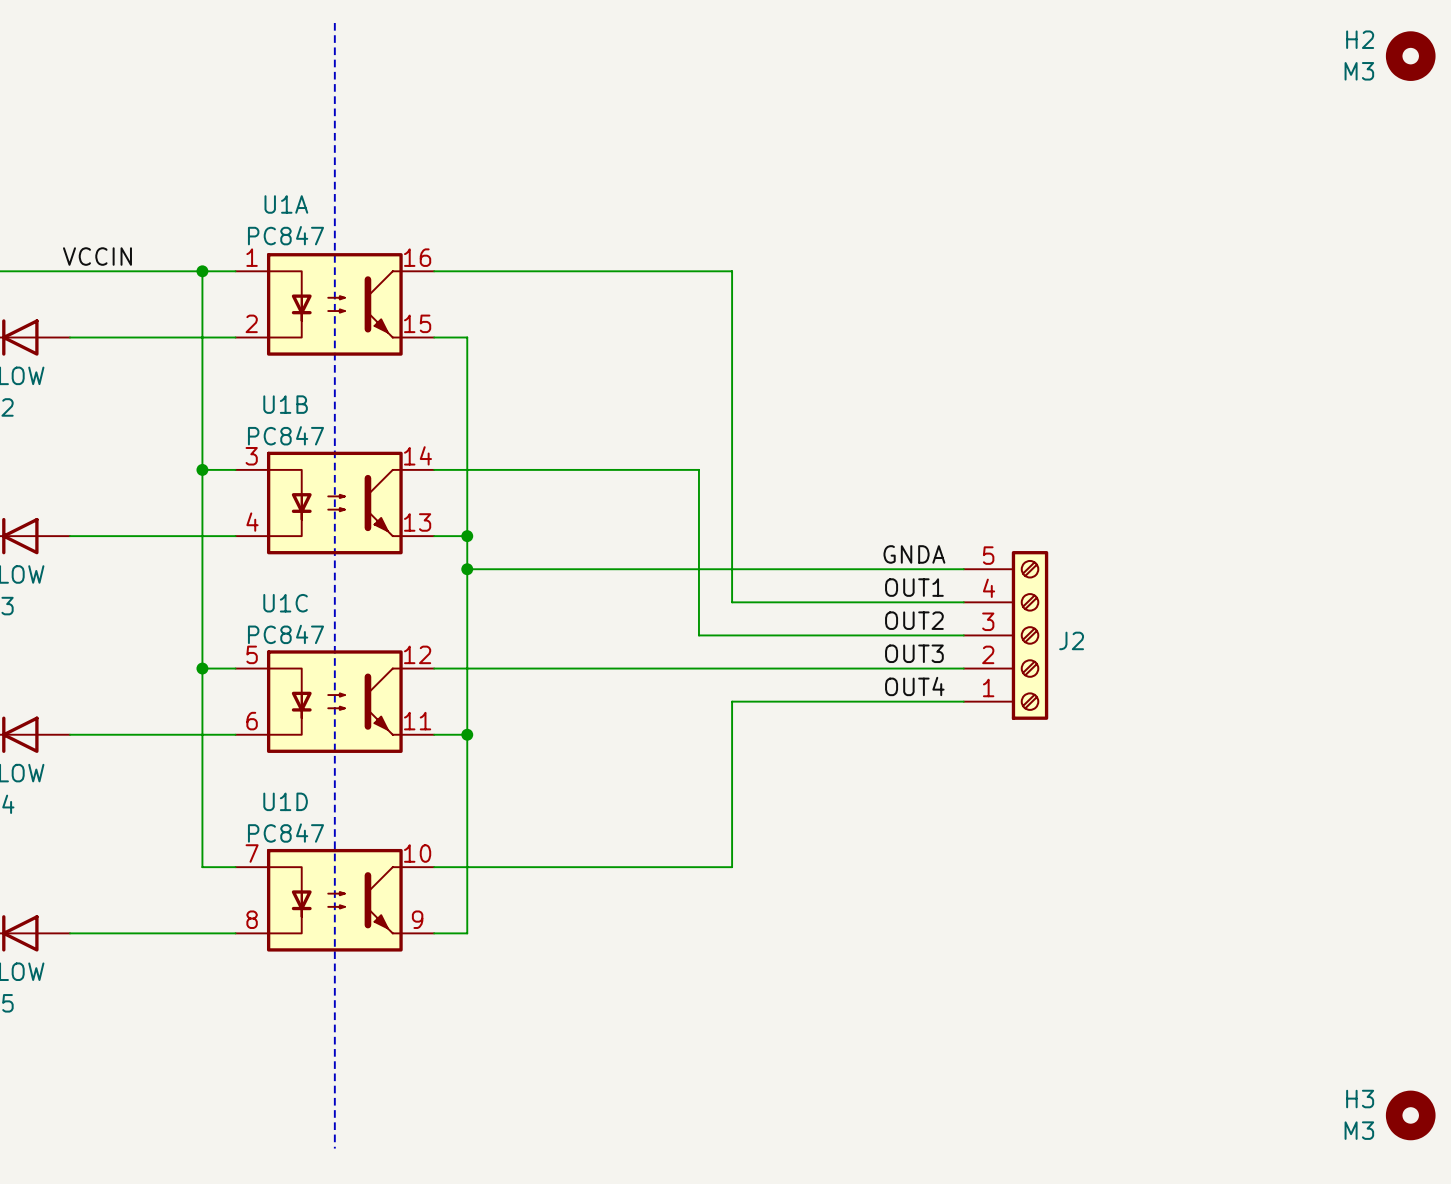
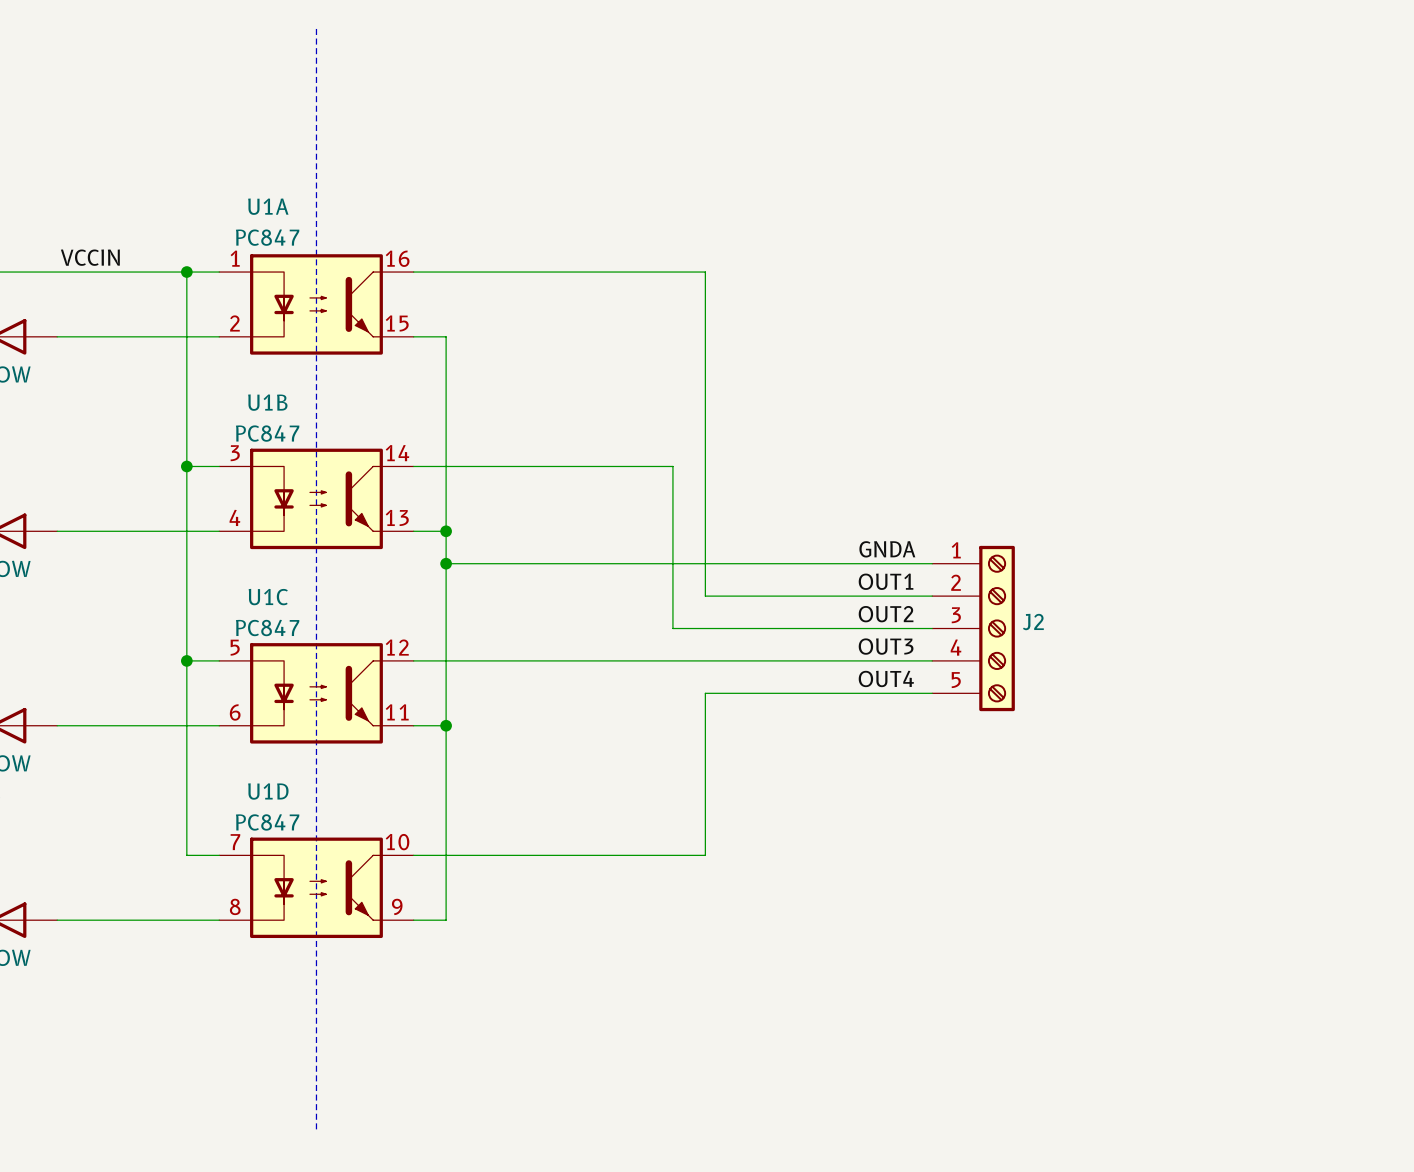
H2: M3 (1410, 56) -> none
J2 flip: as is (1030, 635) -> up-down (997, 628)
H3: M3 (1410, 1115) -> none

